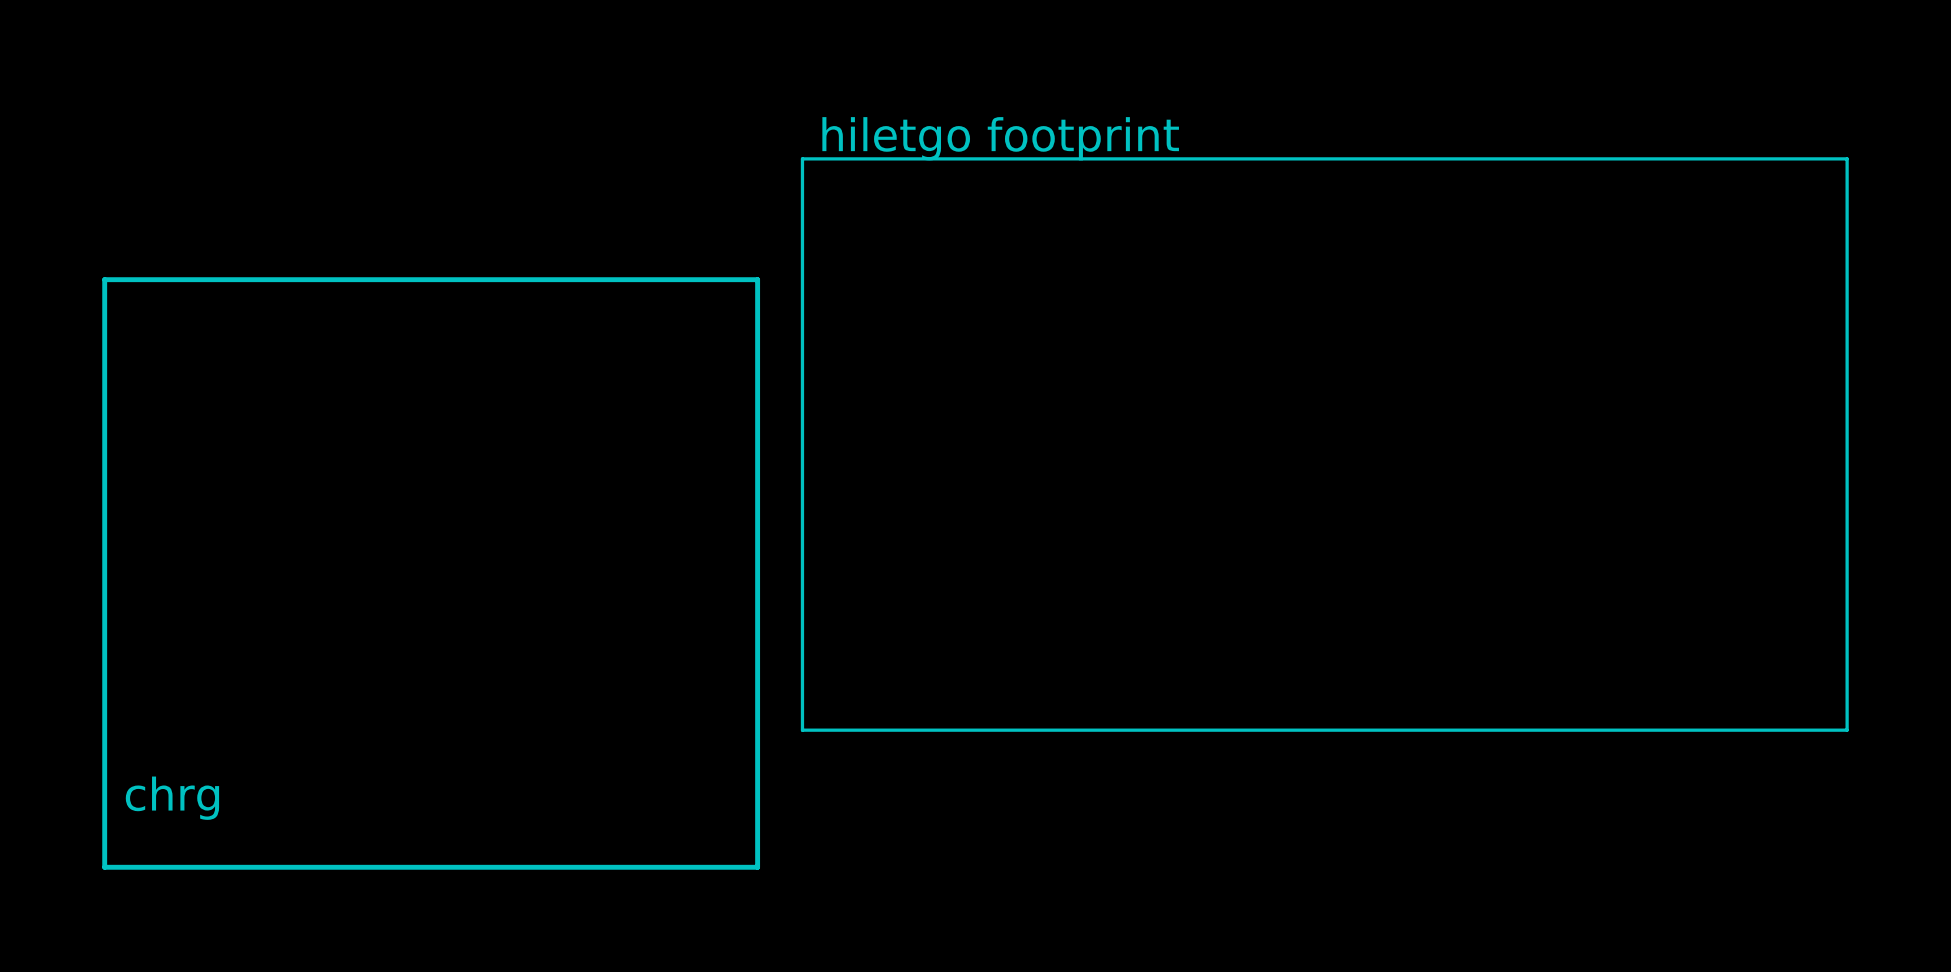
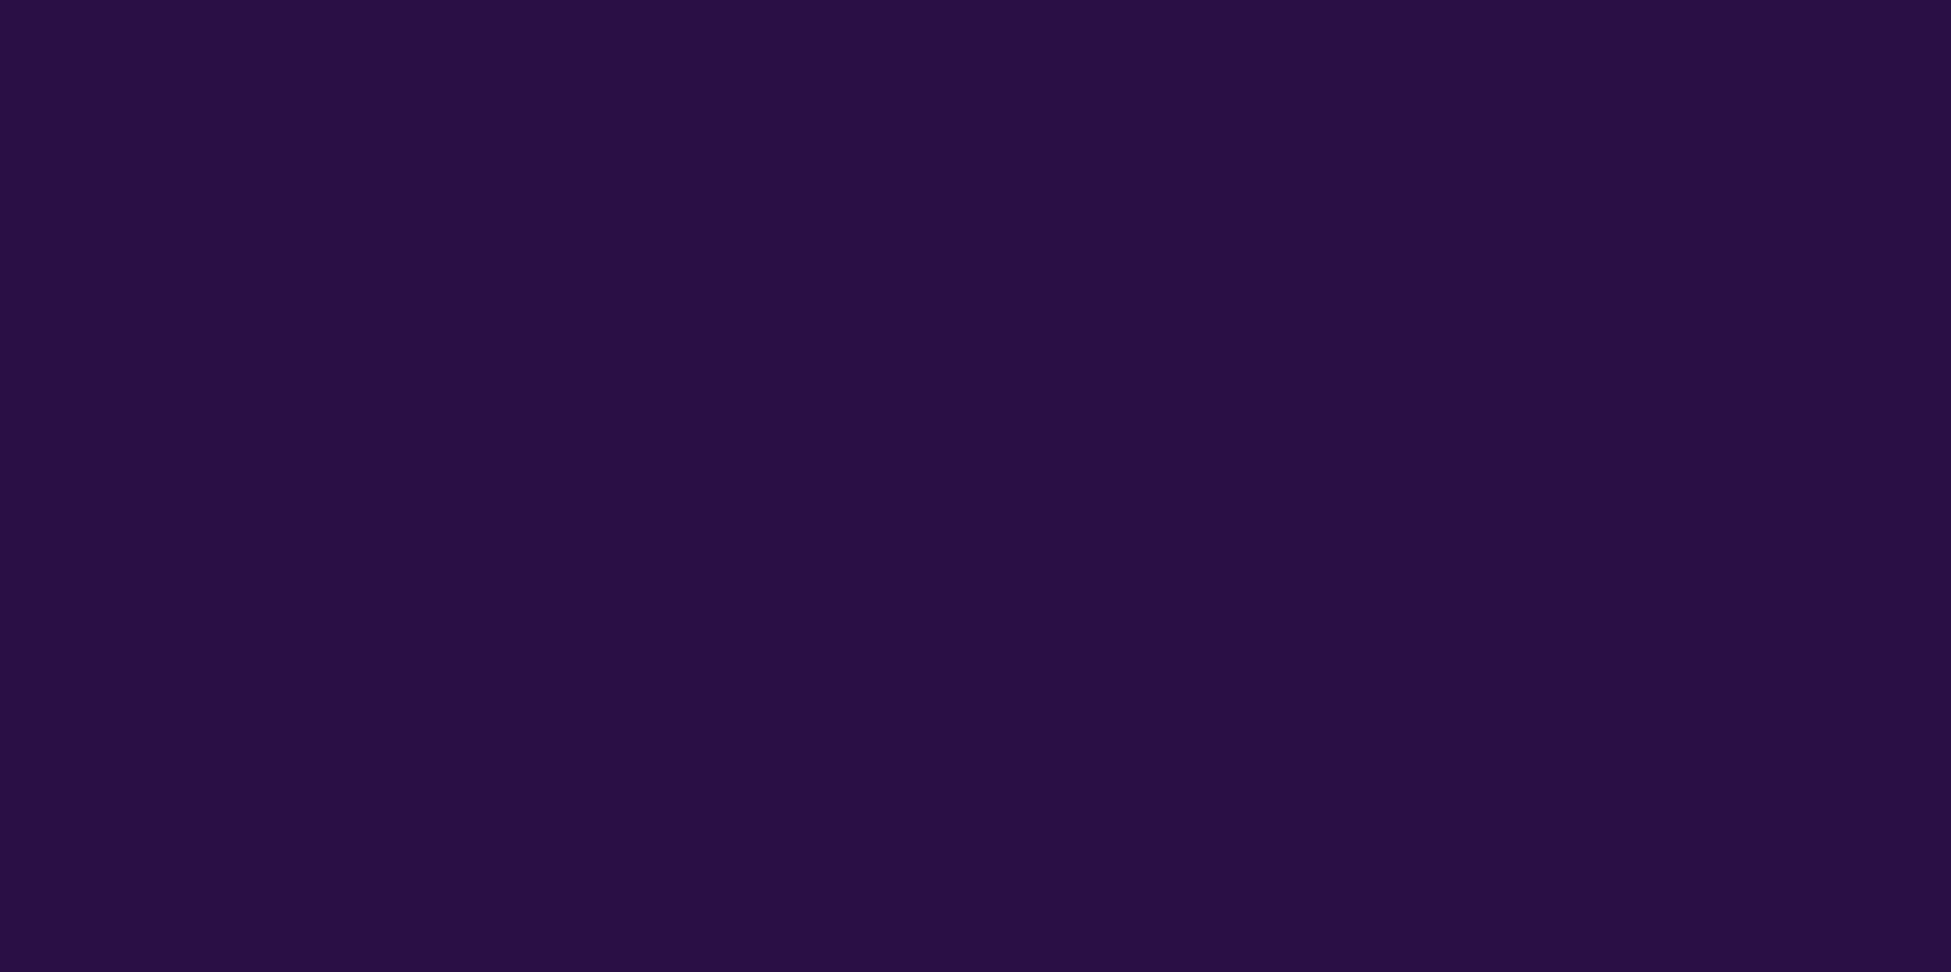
text: hiletgo footprint (1000, 138) -> none
line: (802, 158) (1847, 158) (1847, 730) (802, 730) (802, 158) -> none
line: (104, 279) (757, 279) (757, 867) (104, 867) (104, 279) -> none
text: chrg (172, 798) -> none

